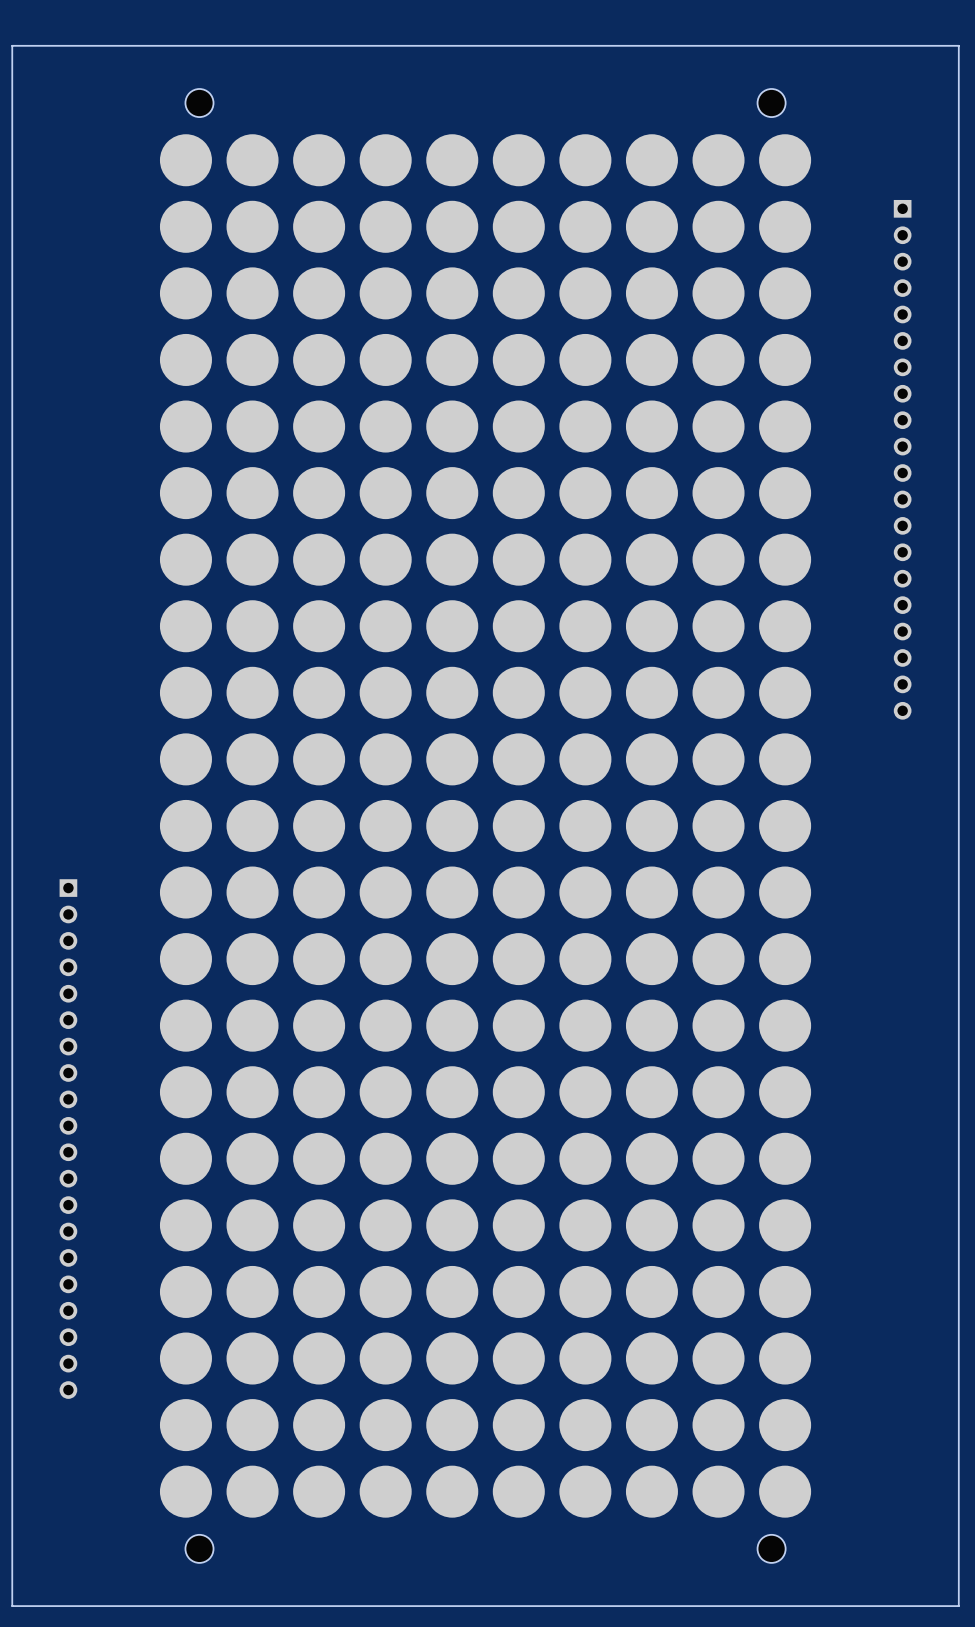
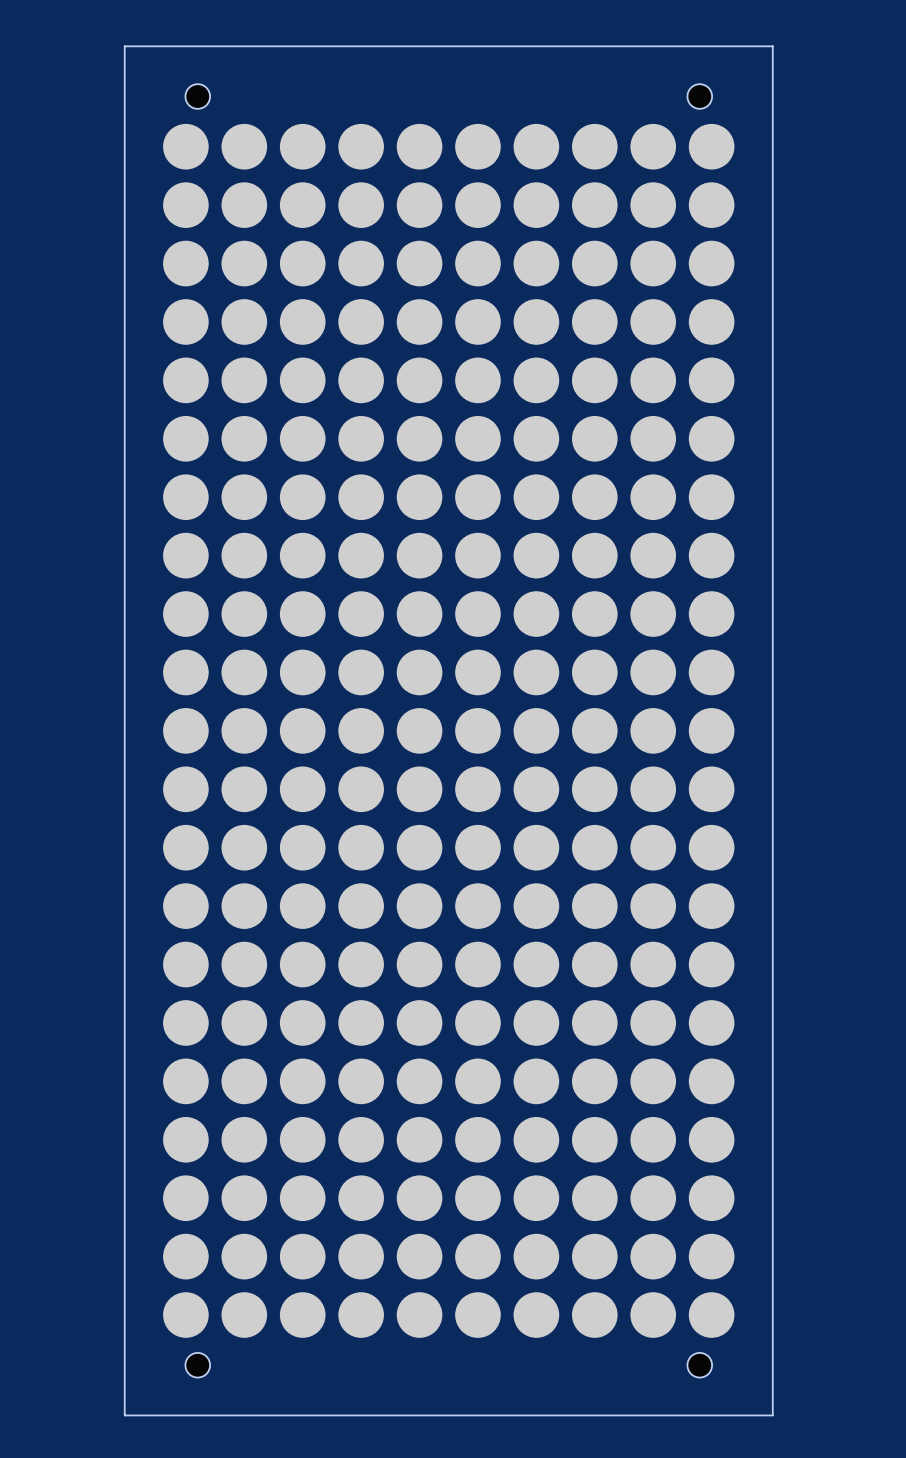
board edge: (116, 45) (12, 45) (12, 1606) (116, 1606) -> (124, 46) (124, 1415)
board edge: (854, 45) (958, 45) (958, 1606) (854, 1606) -> (772, 46) (772, 1415)
part: (902, 459) -> none
part: (68, 1139) -> none

